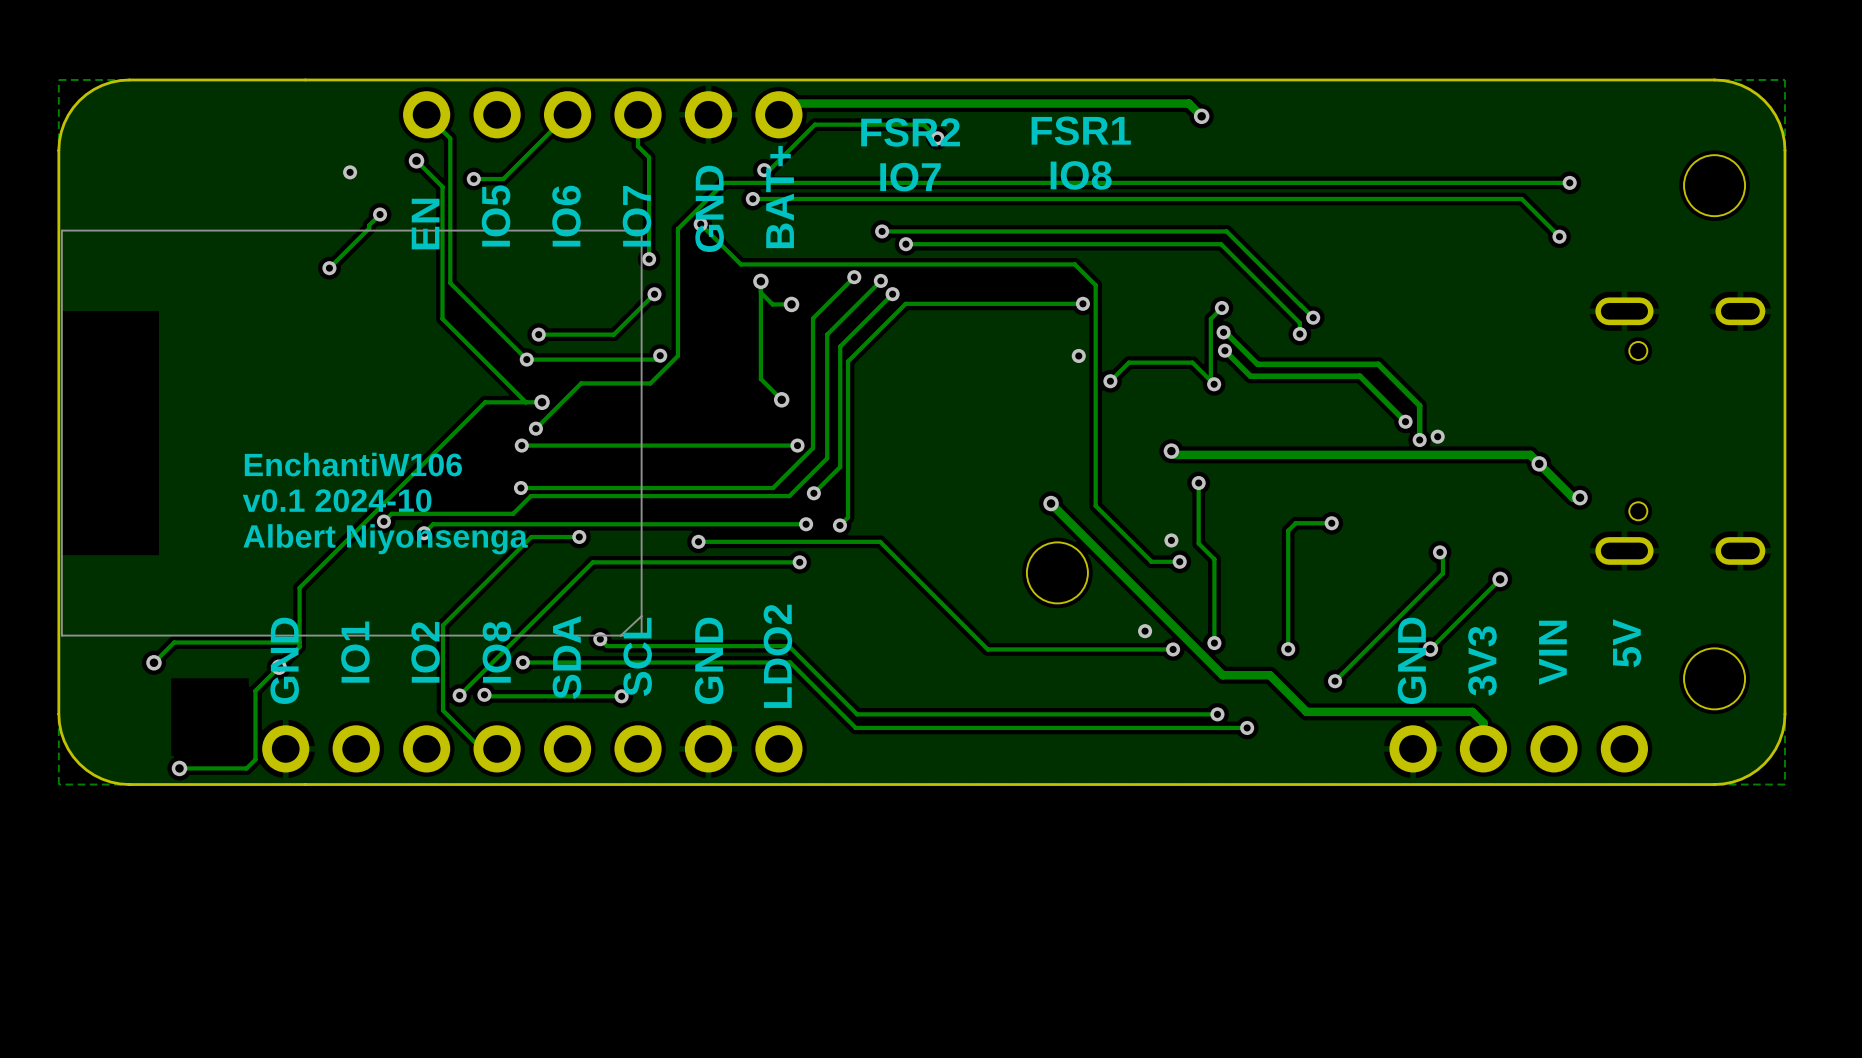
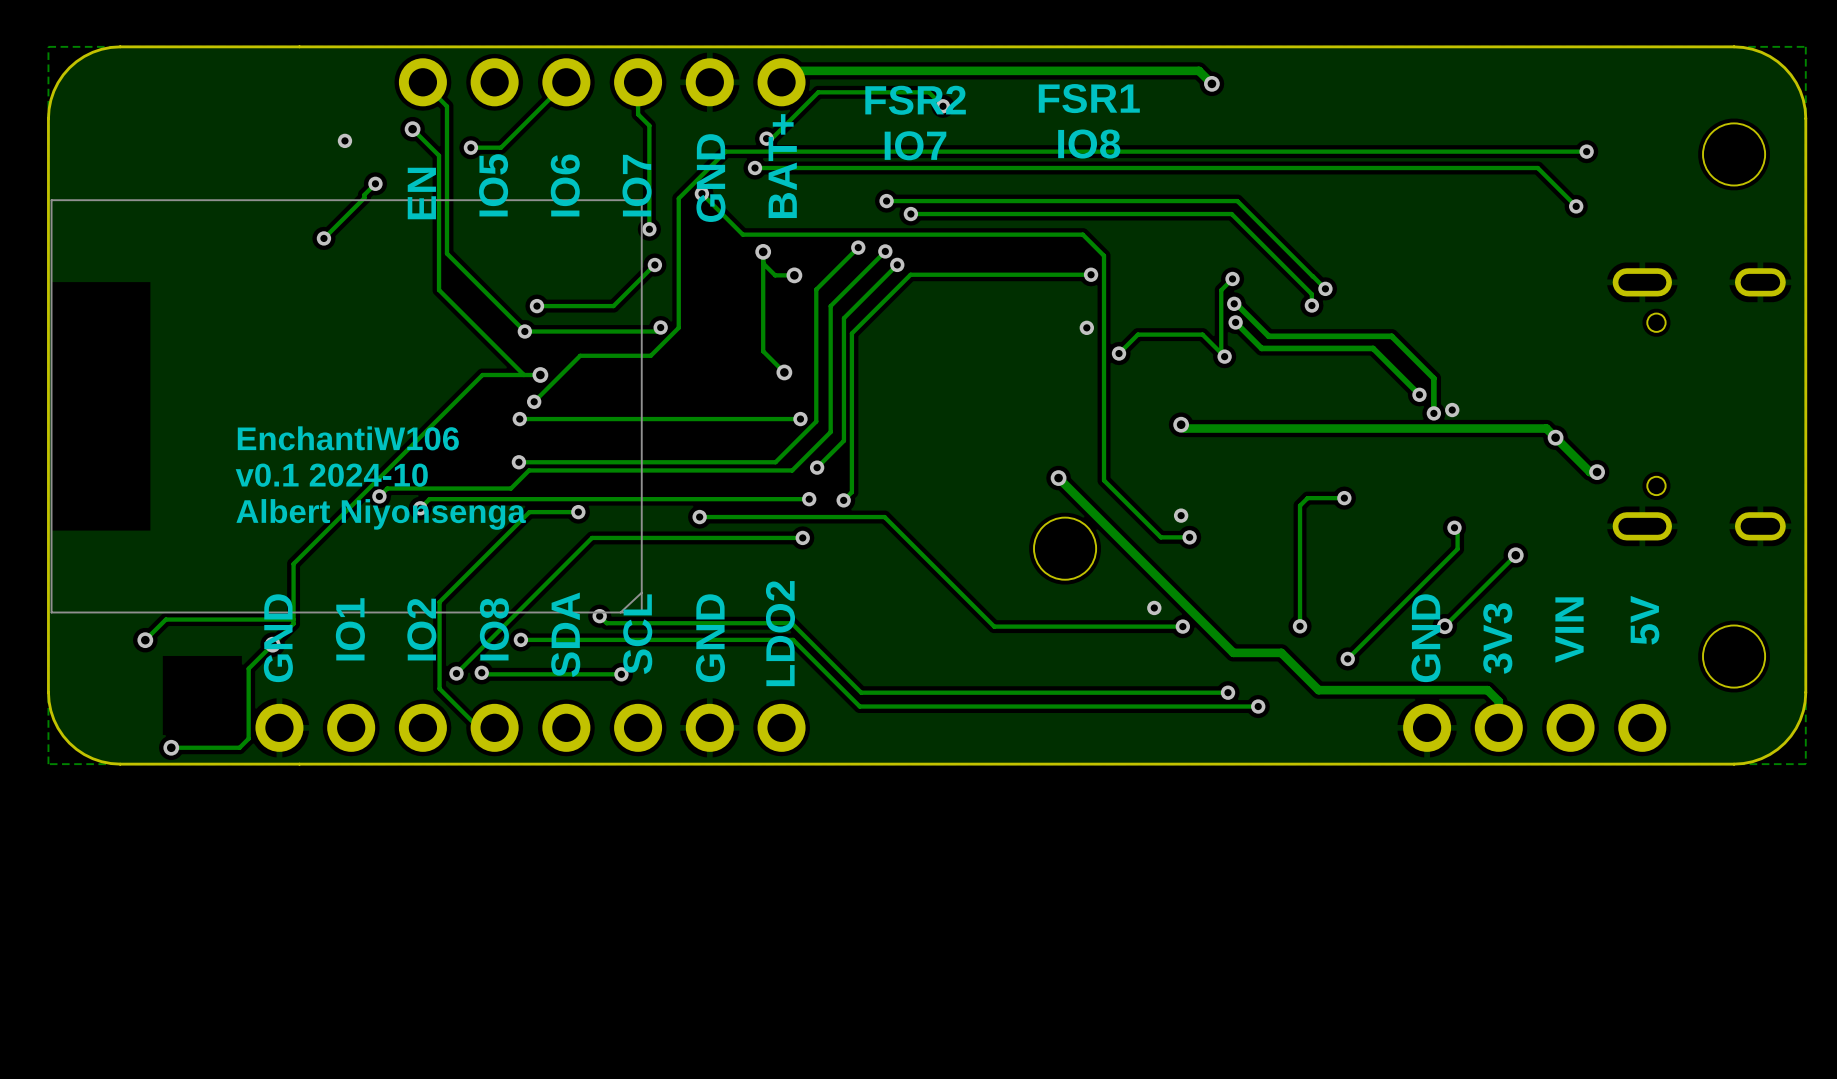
track: (1198, 483) (1198, 543) (1214, 559) (1214, 643) -> none
via: (1198, 483) -> none
via: (1214, 643) -> none

